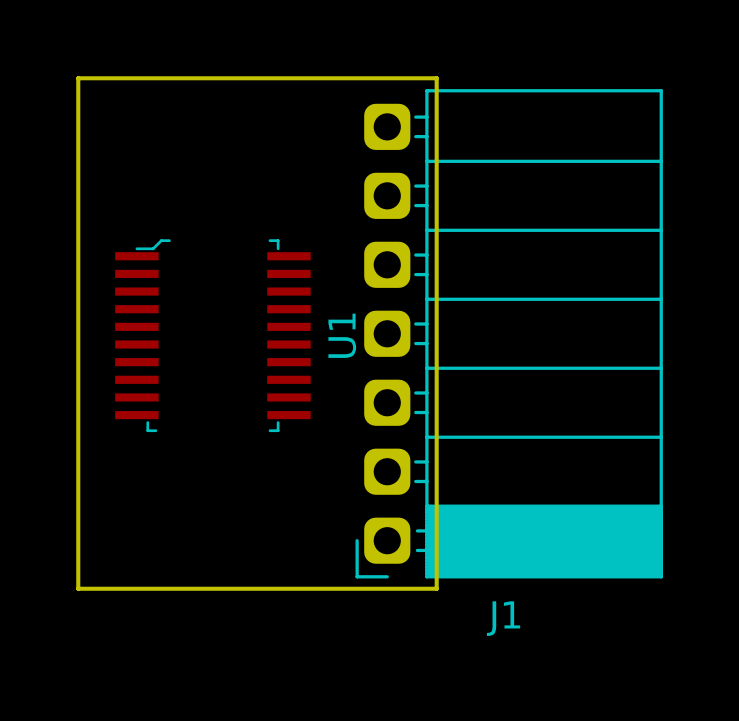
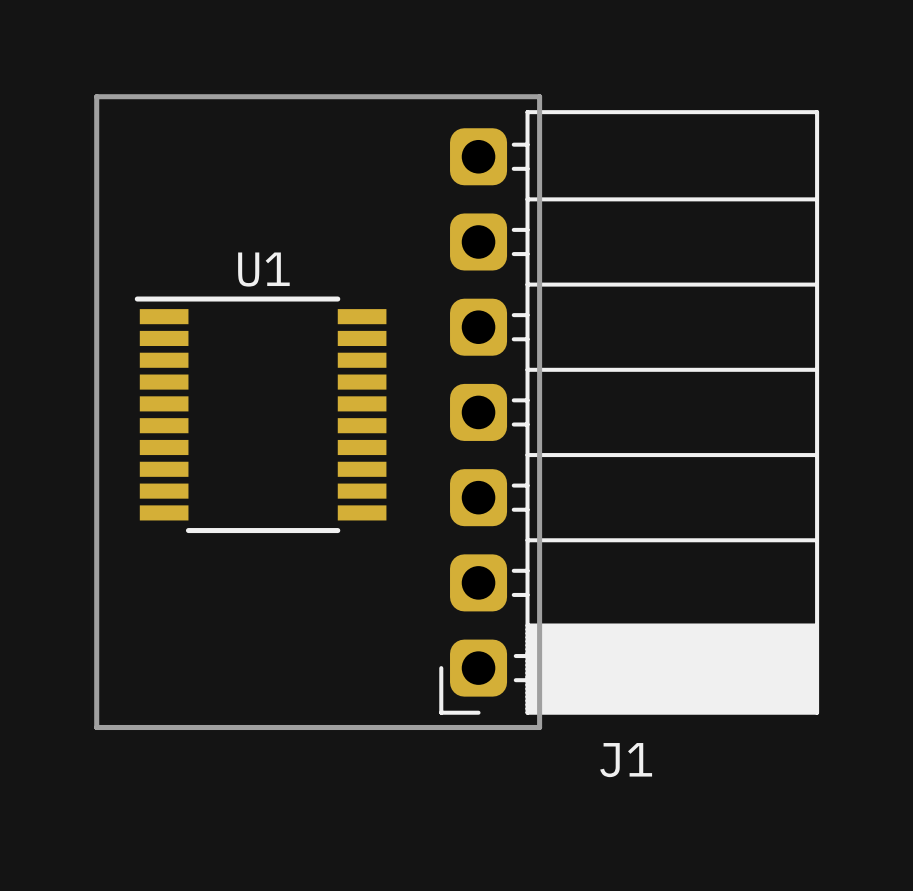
U1 footprint: [115, 239, 311, 433] -> [134, 296, 387, 534]
U1 name position: U1 (342, 335) -> U1 (263, 269)

